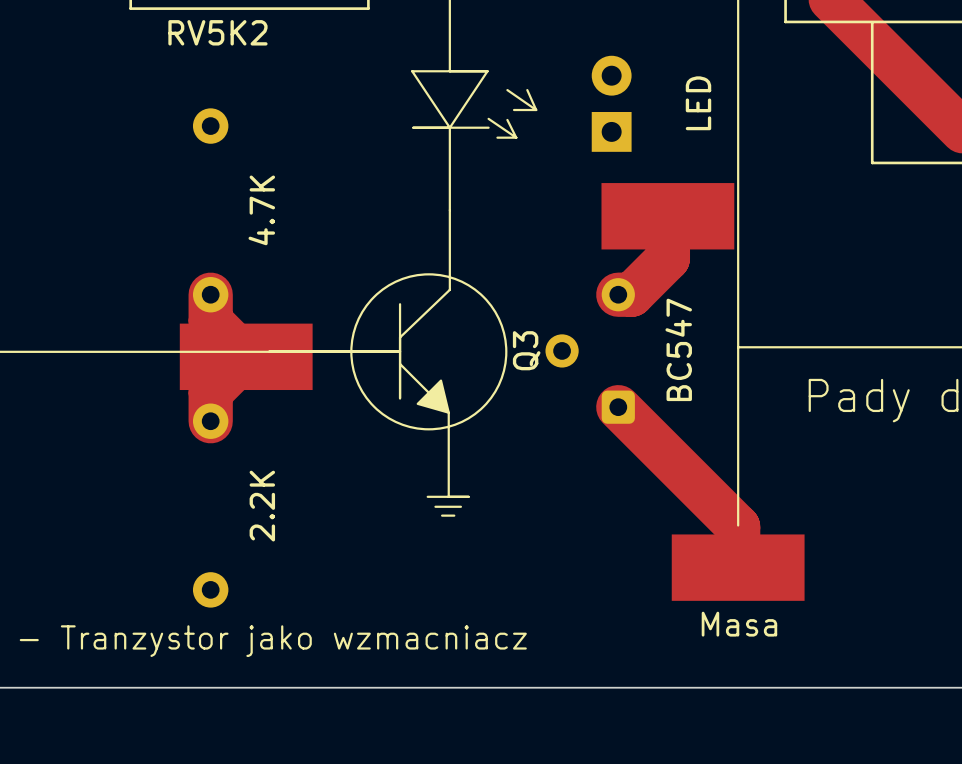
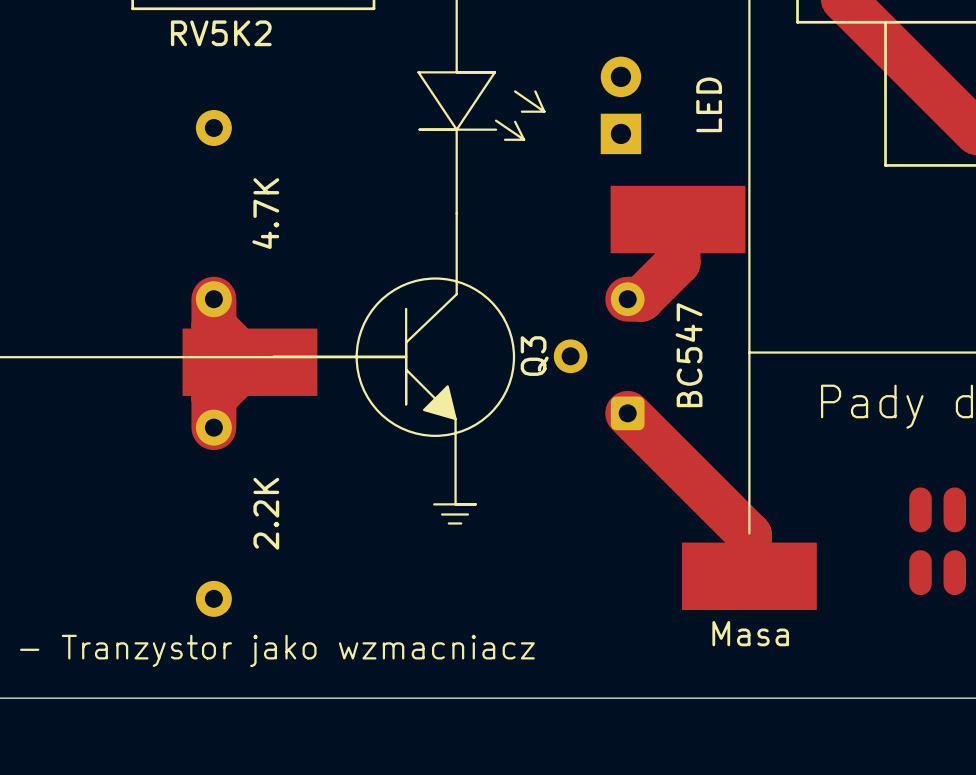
part: none -> (920, 509)
part: none -> (954, 509)
part: none -> (920, 572)
part: none -> (954, 572)

